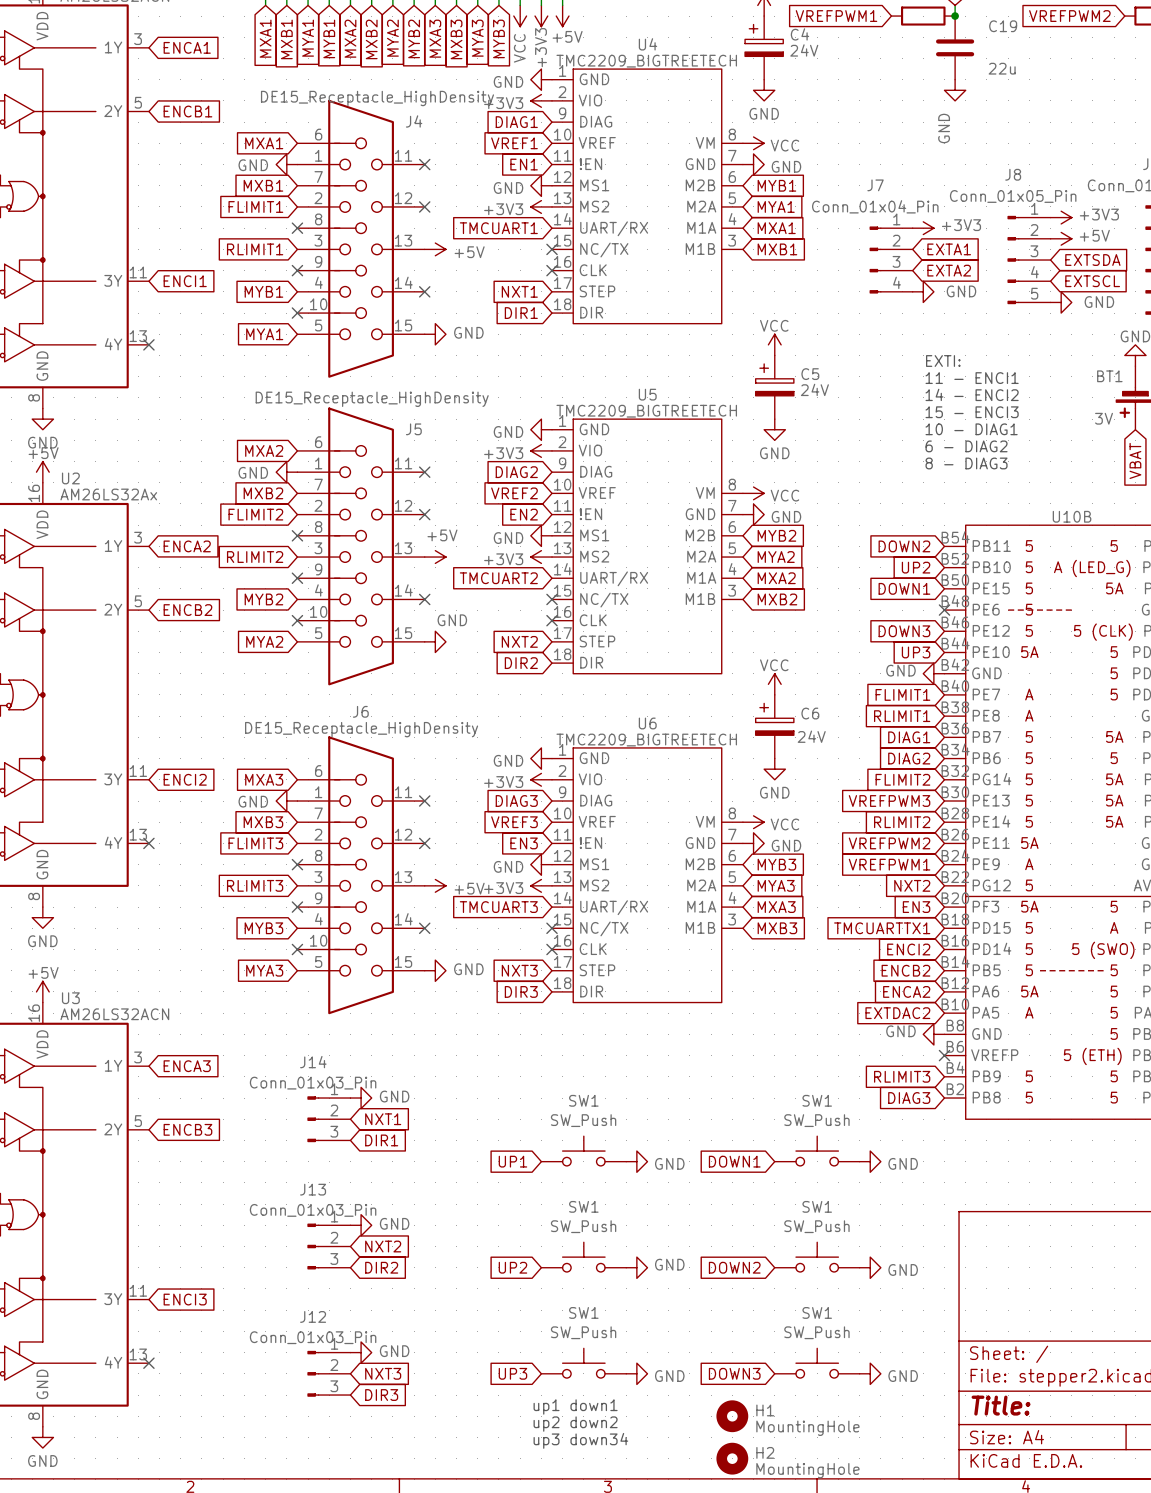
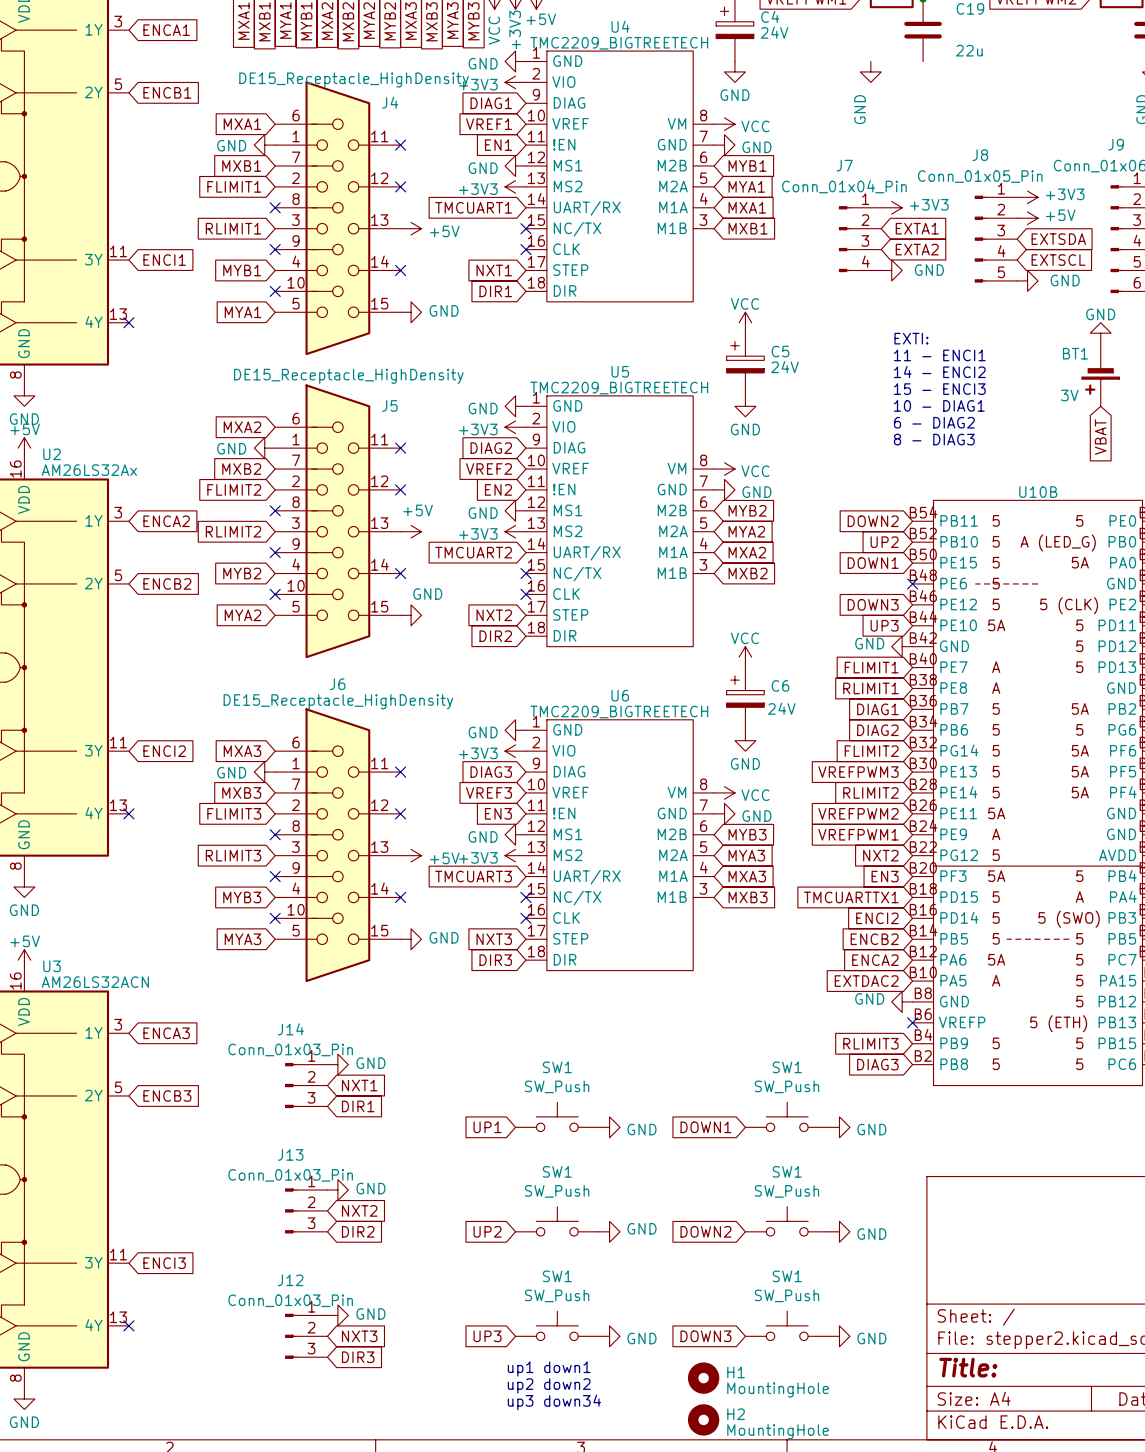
power symbol position: GND (955, 90) -> GND (870, 71)

